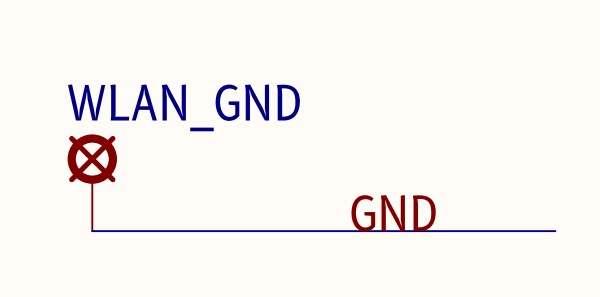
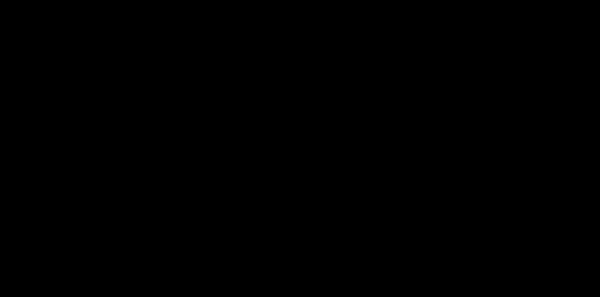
WLAN_GND: (92, 182) -> none
label: GND (393, 213) -> none
wire: (92, 231) (555, 231) -> none

